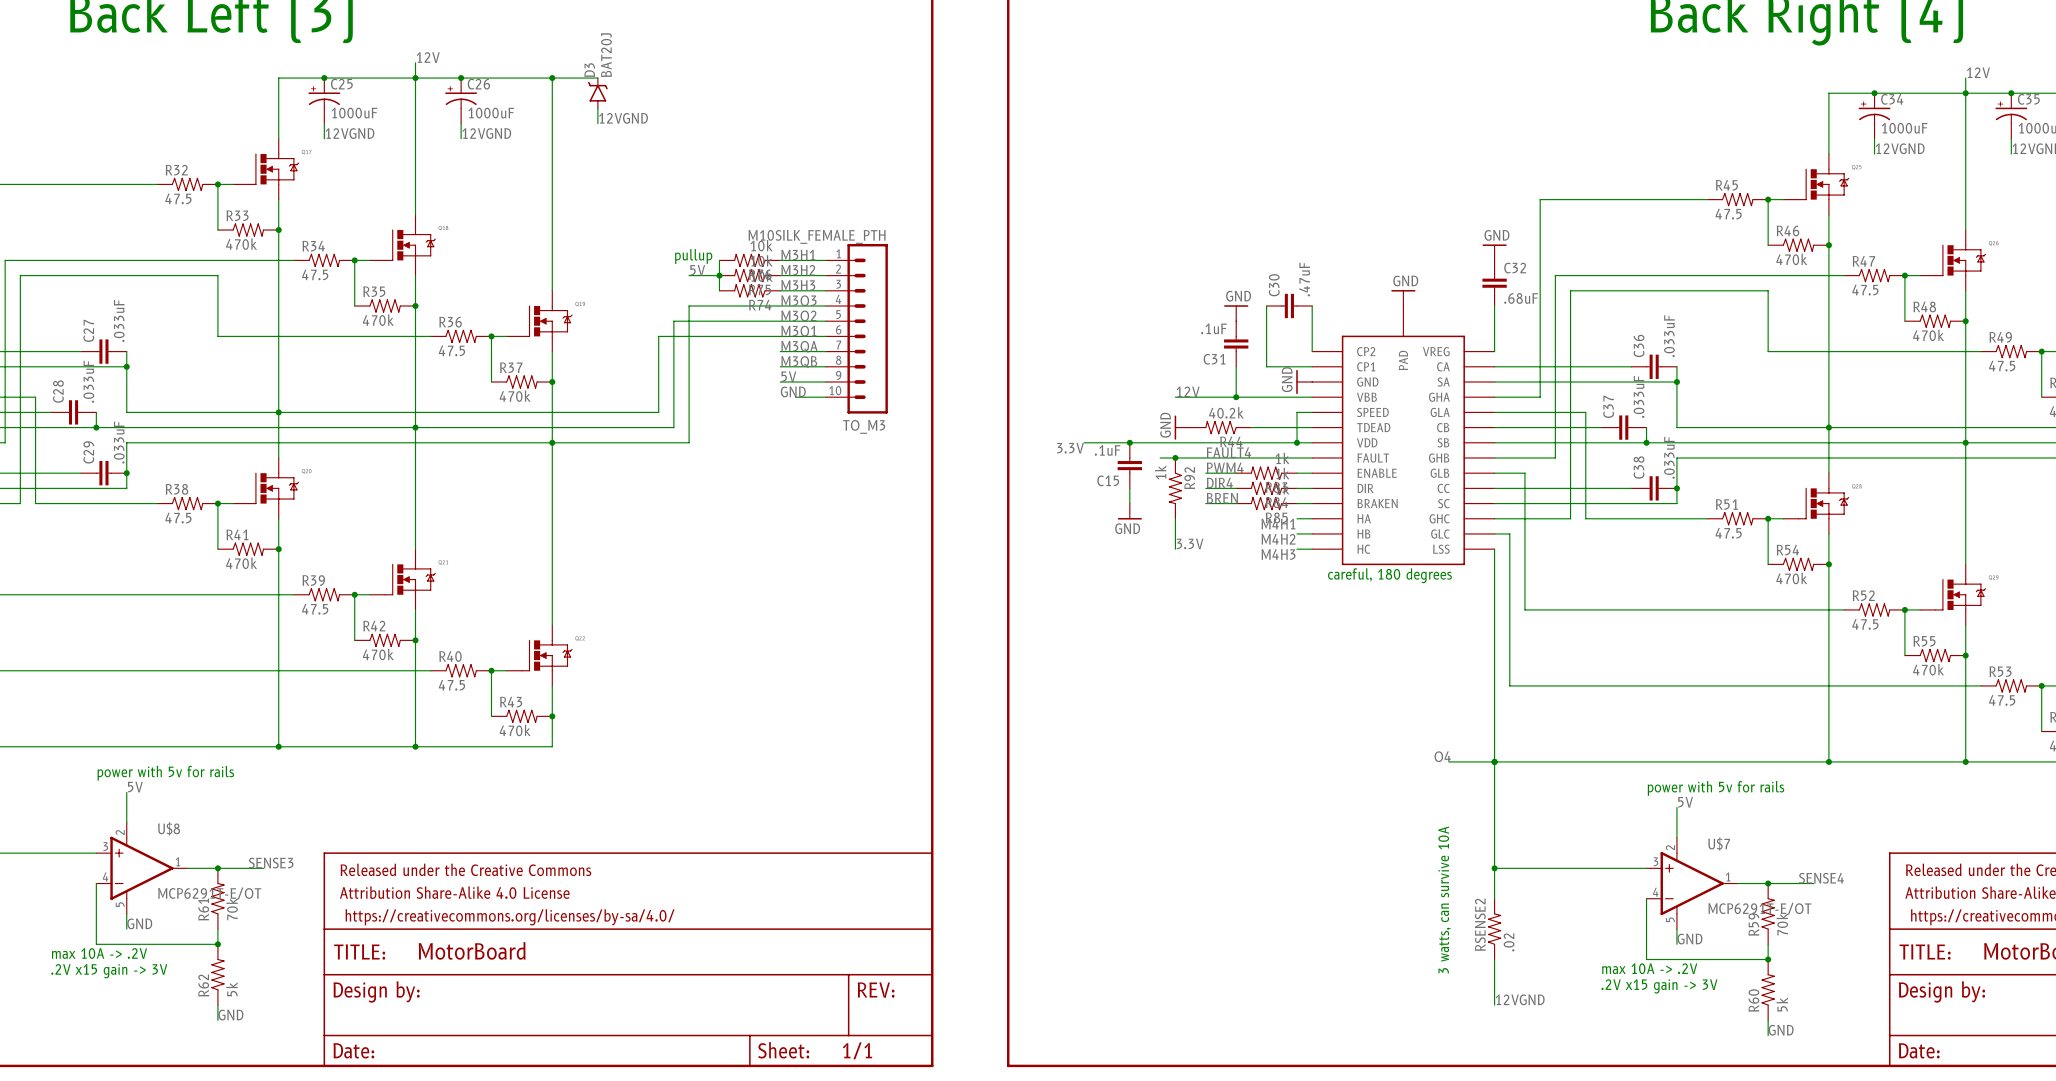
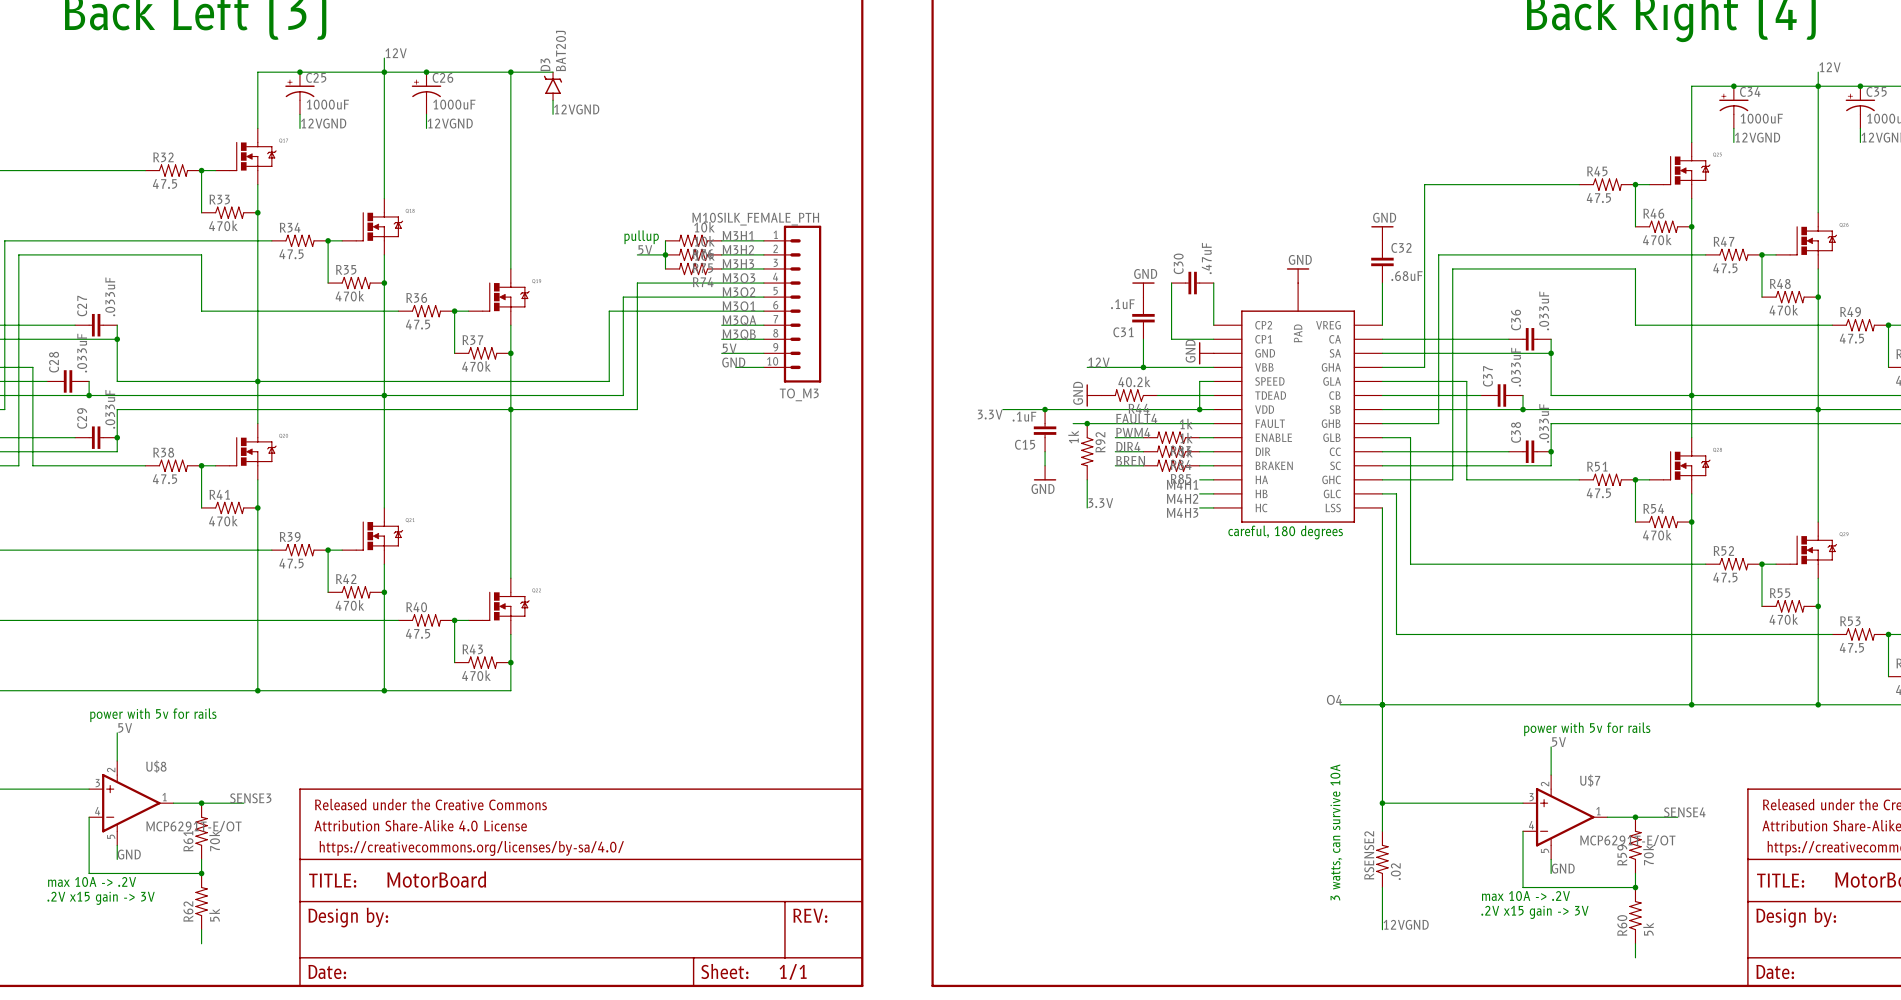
label: GND (230, 1015) -> none
label: GND (1781, 1030) -> none

